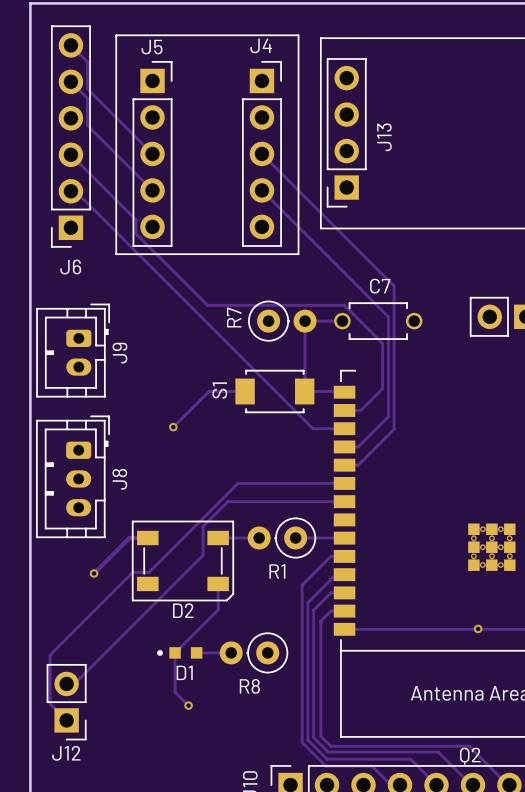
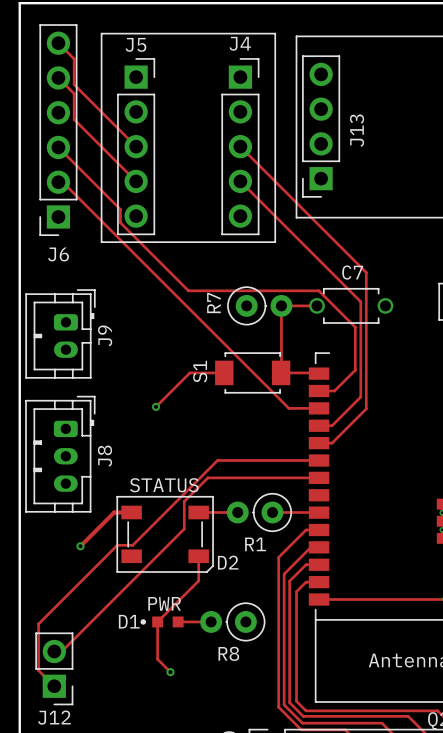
text: none -> STATUS (164, 485)
D2 name position: D2 (183, 610) -> D2 (228, 562)
text: none -> PWR (164, 603)
D1 name position: D1 (184, 672) -> D1 (129, 621)

